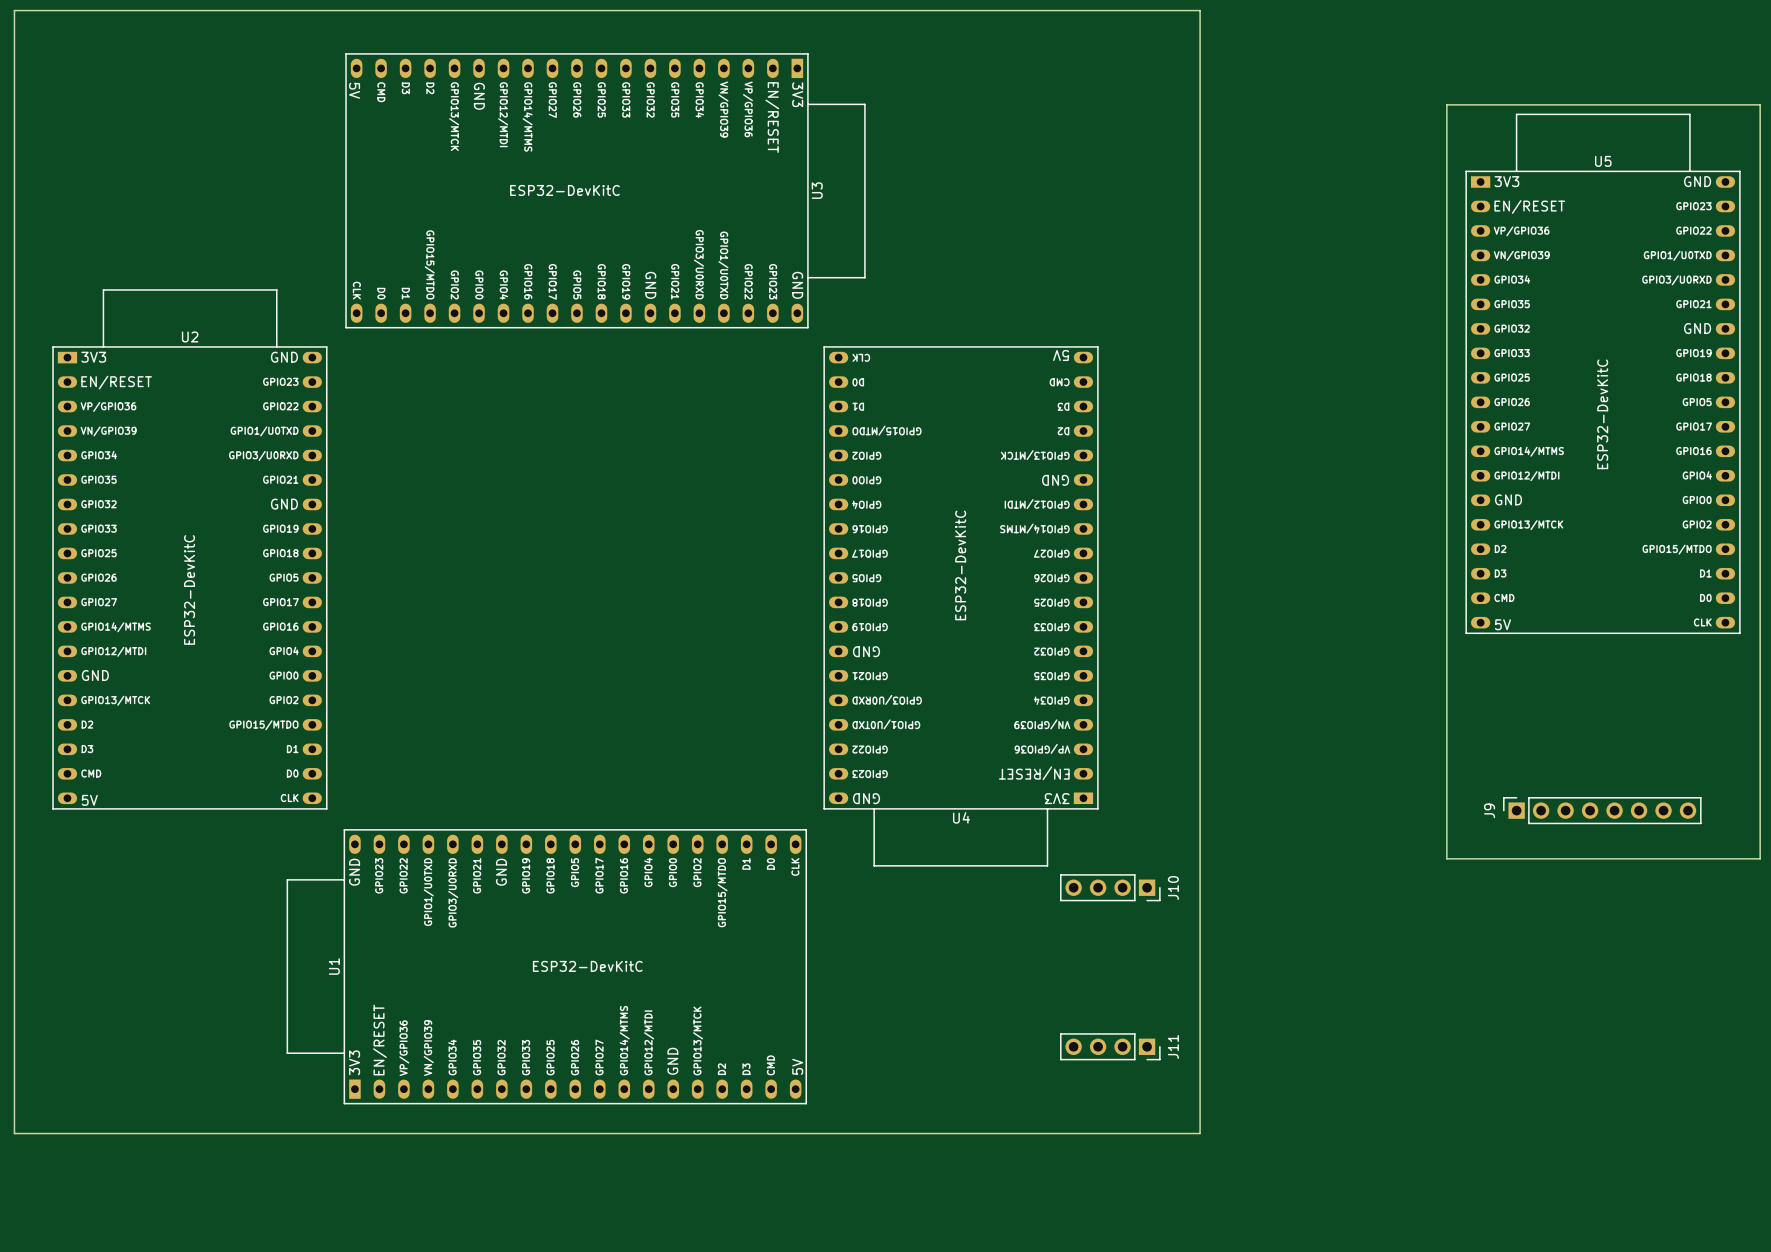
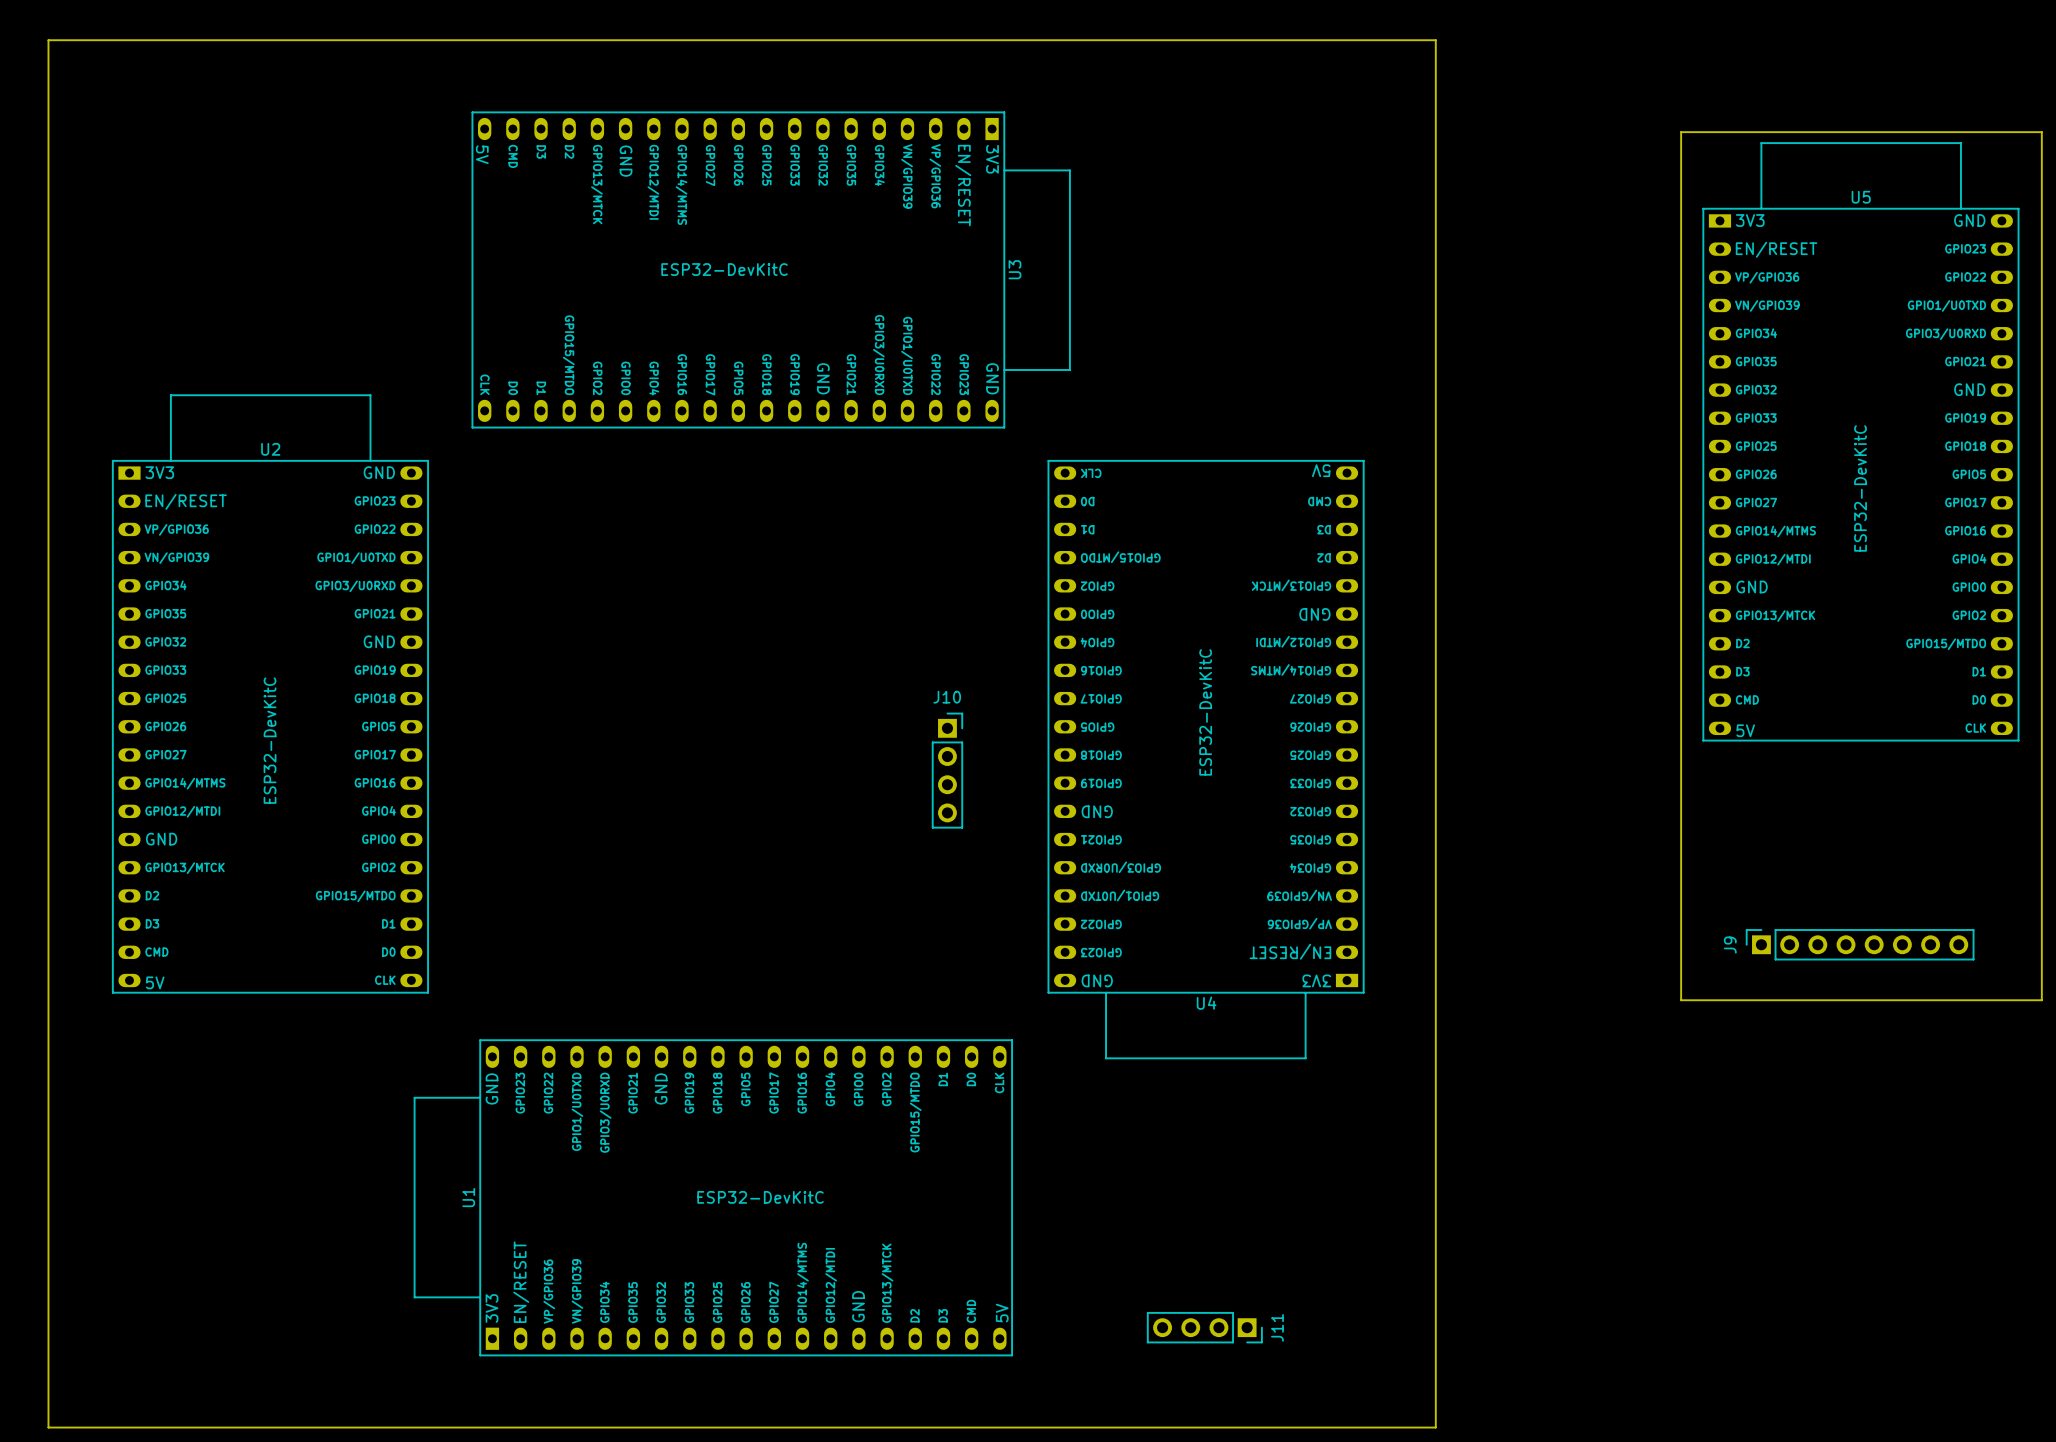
board edge: (14, 10) (1200, 10) (1200, 1133) (14, 1133) (14, 10) -> (48, 40) (48, 1427) (1435, 1427) (1435, 40) (48, 40)
U3 position: (605, 190) -> (771, 269)
U2 position: (189, 549) -> (270, 693)
U4 position: (961, 606) -> (1206, 759)
J10 rotation: 0° (1110, 887) -> 90° counterclockwise (947, 770)
J10 position: (1110, 887) -> (947, 770)
U1 position: (546, 966) -> (713, 1197)
J11 position: (1110, 1046) -> (1204, 1327)

